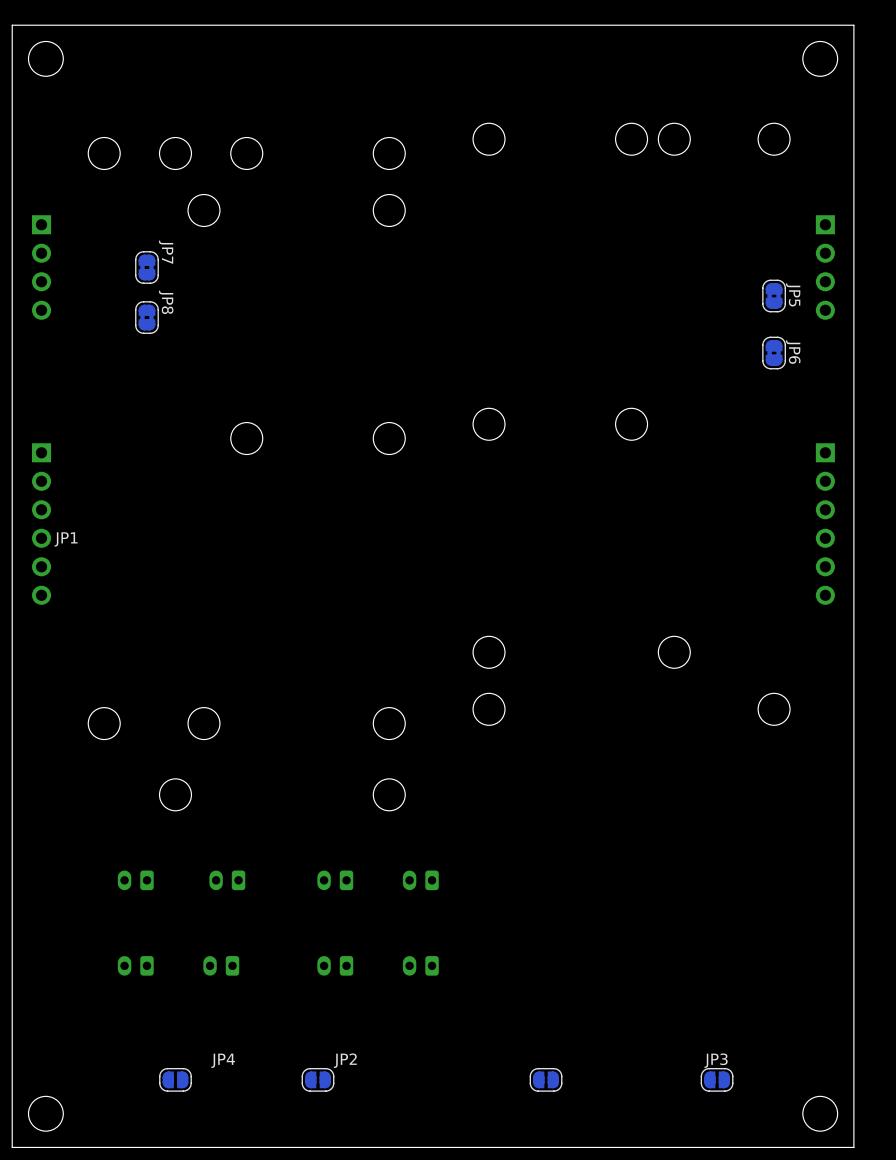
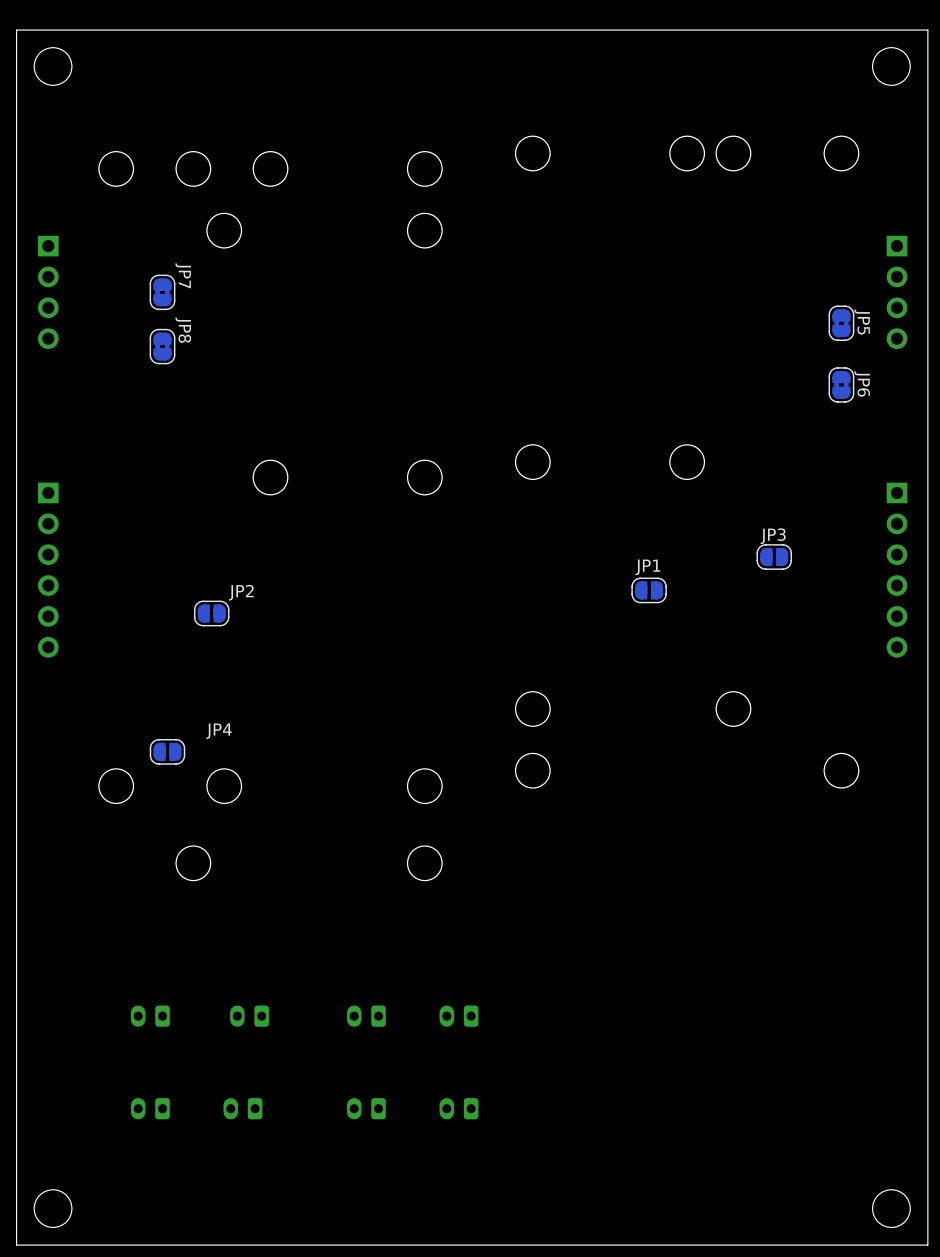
JP1 name position: JP1 (66, 539) -> JP1 (647, 567)
part: (135, 880) -> none
part: (227, 880) -> none
part: (335, 880) -> none
part: (420, 880) -> none
part: none -> (150, 1016)
part: none -> (249, 1016)
part: none -> (366, 1016)
part: none -> (458, 1016)
part: (135, 965) -> none
part: (221, 965) -> none
part: (335, 965) -> none
part: (420, 965) -> none
part: none -> (150, 1108)
part: none -> (242, 1108)
part: none -> (366, 1108)
part: none -> (458, 1108)
JP4 position: (175, 1079) -> (167, 751)
JP2 position: (318, 1079) -> (211, 613)
JP1 position: (546, 1079) -> (649, 590)
JP3 position: (717, 1079) -> (774, 557)

